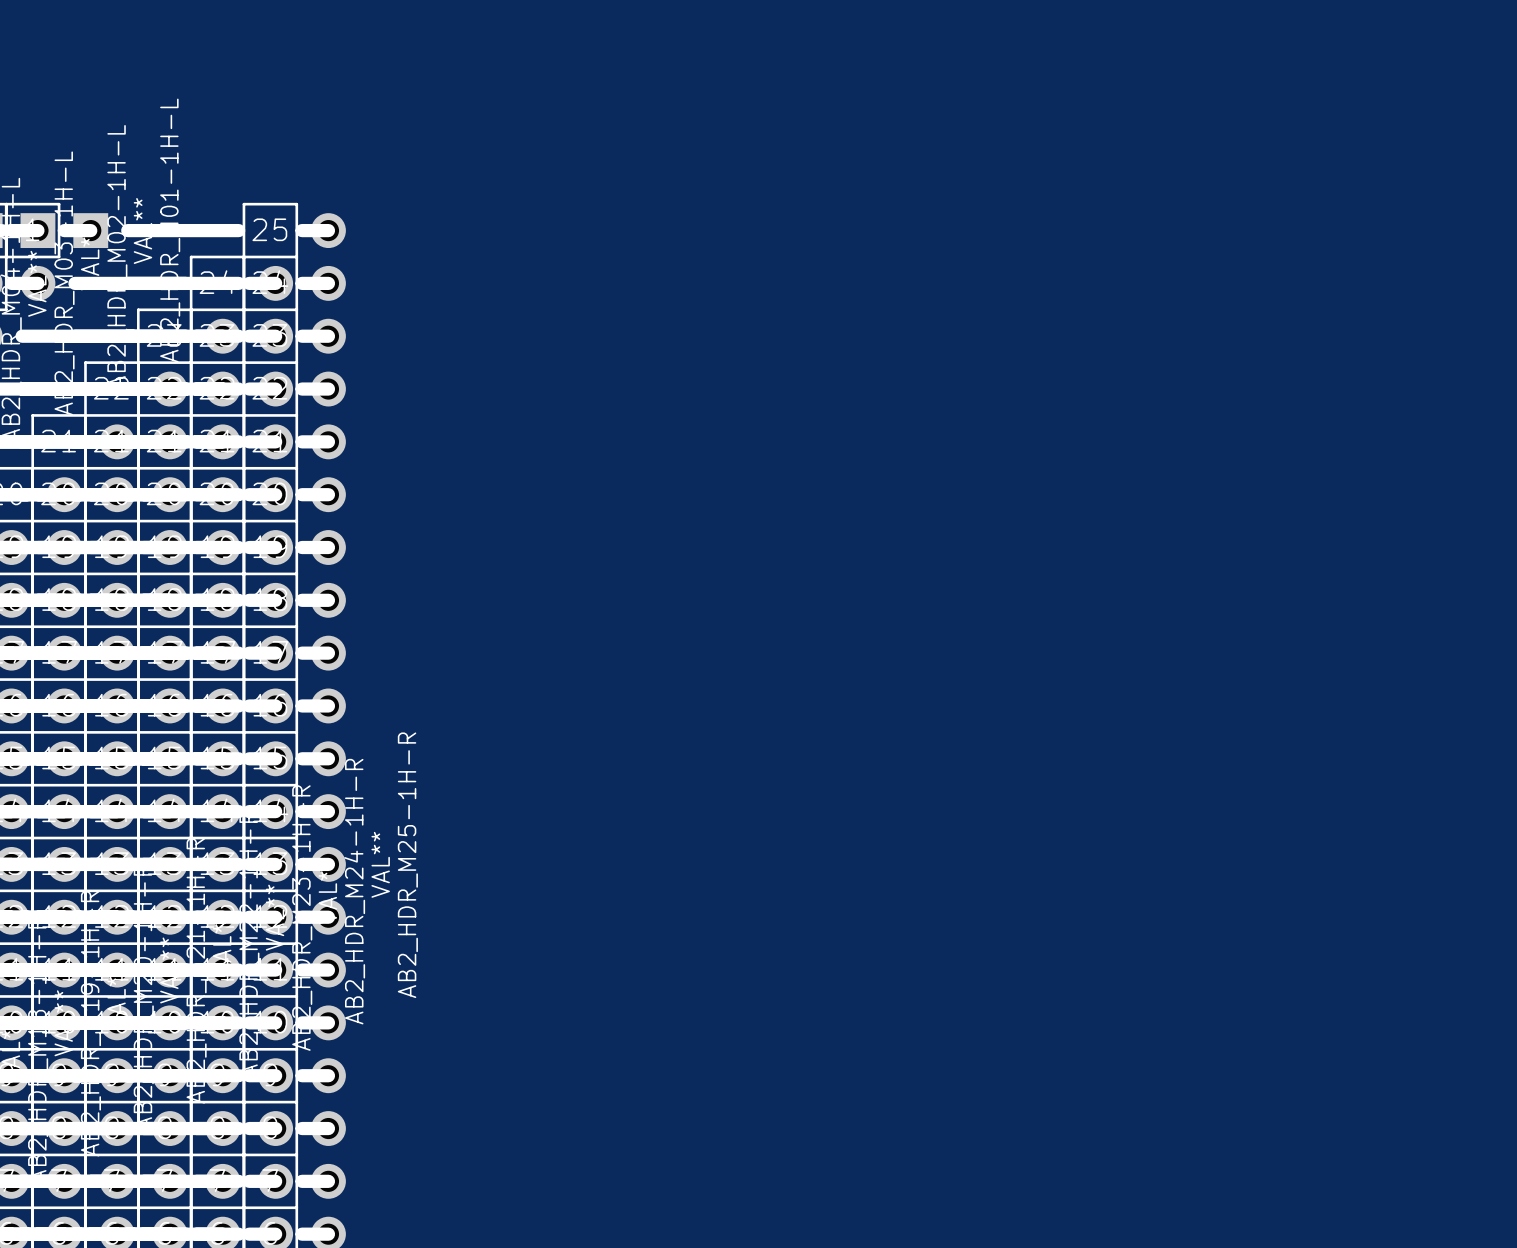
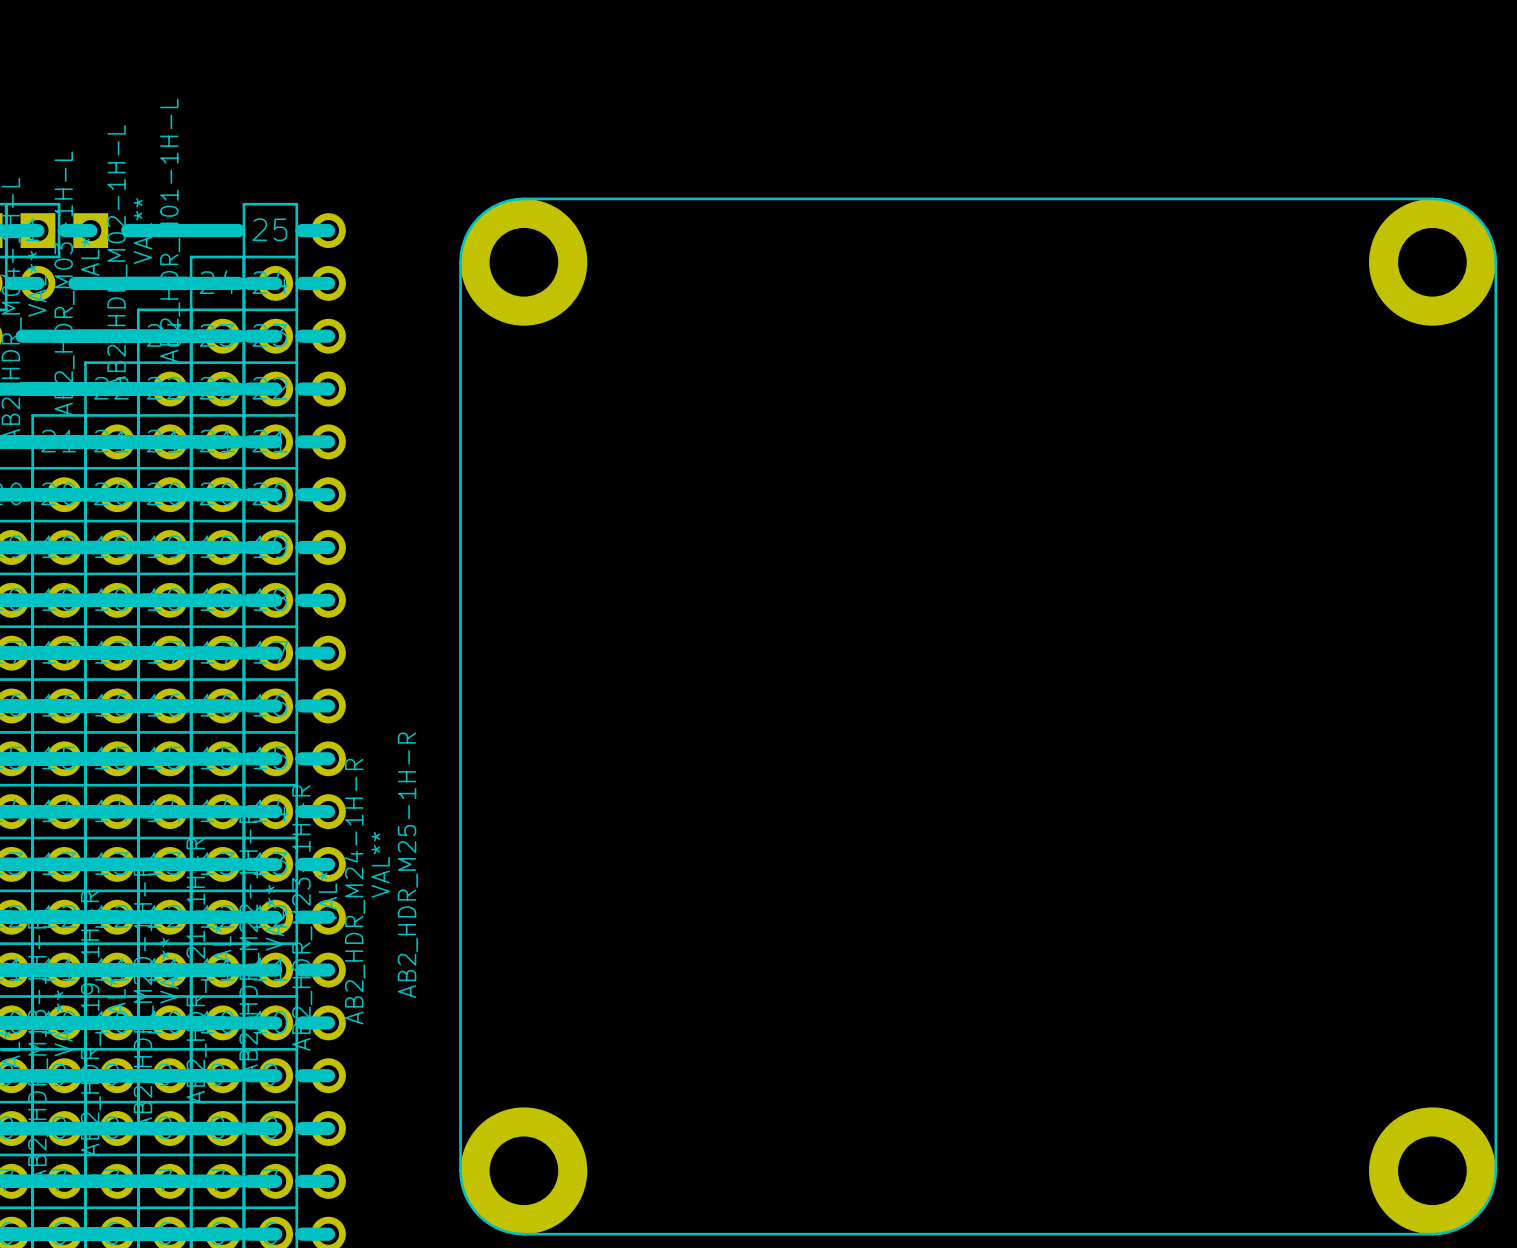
part: none -> (978, 716)

